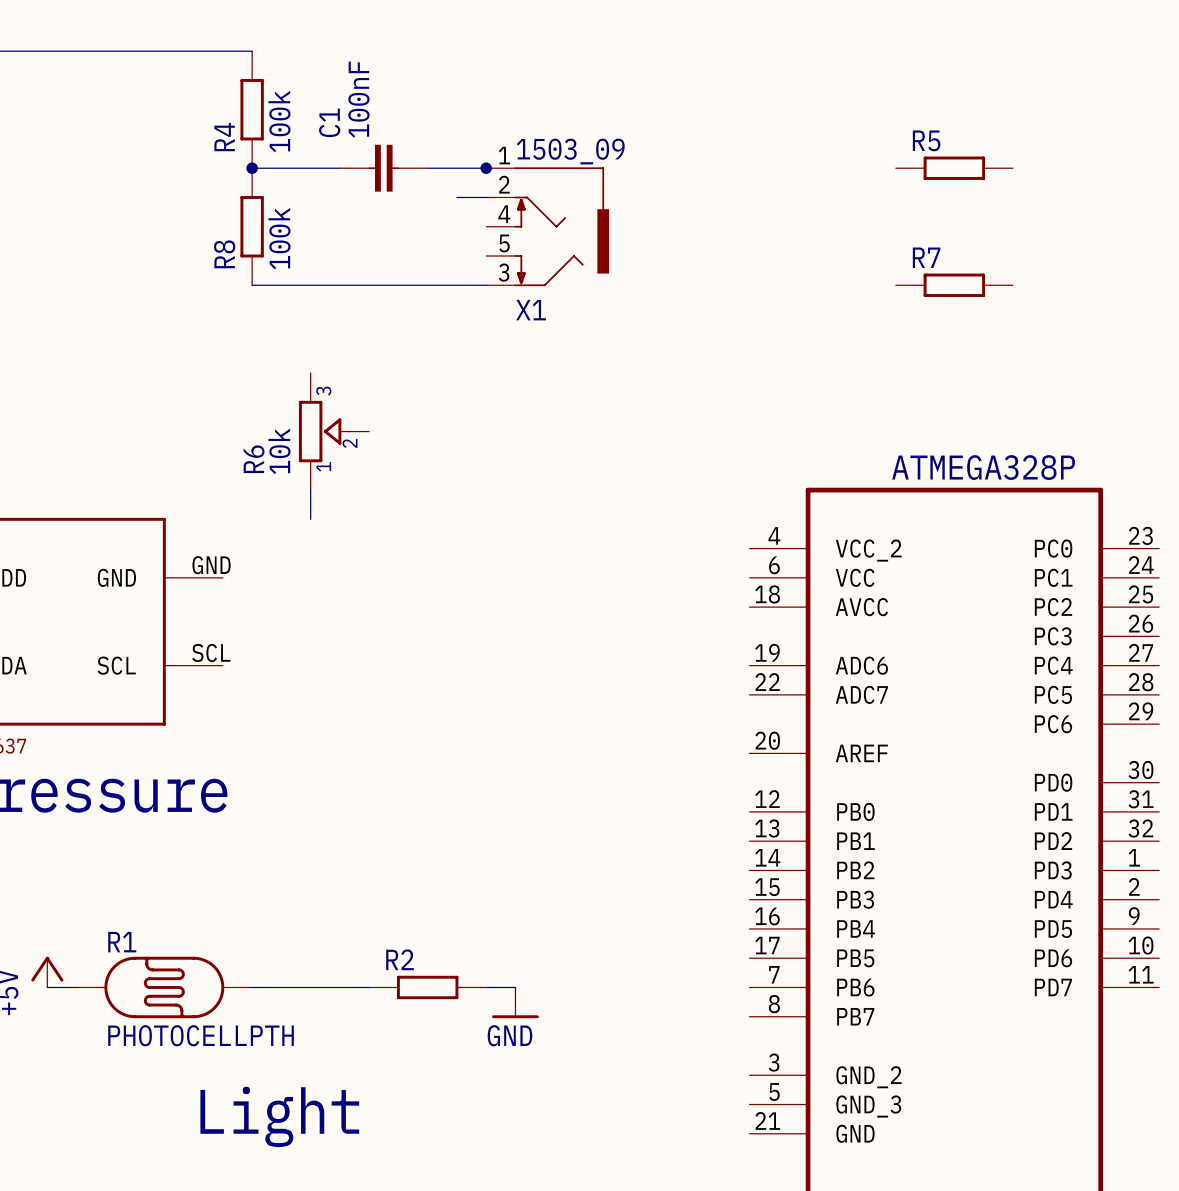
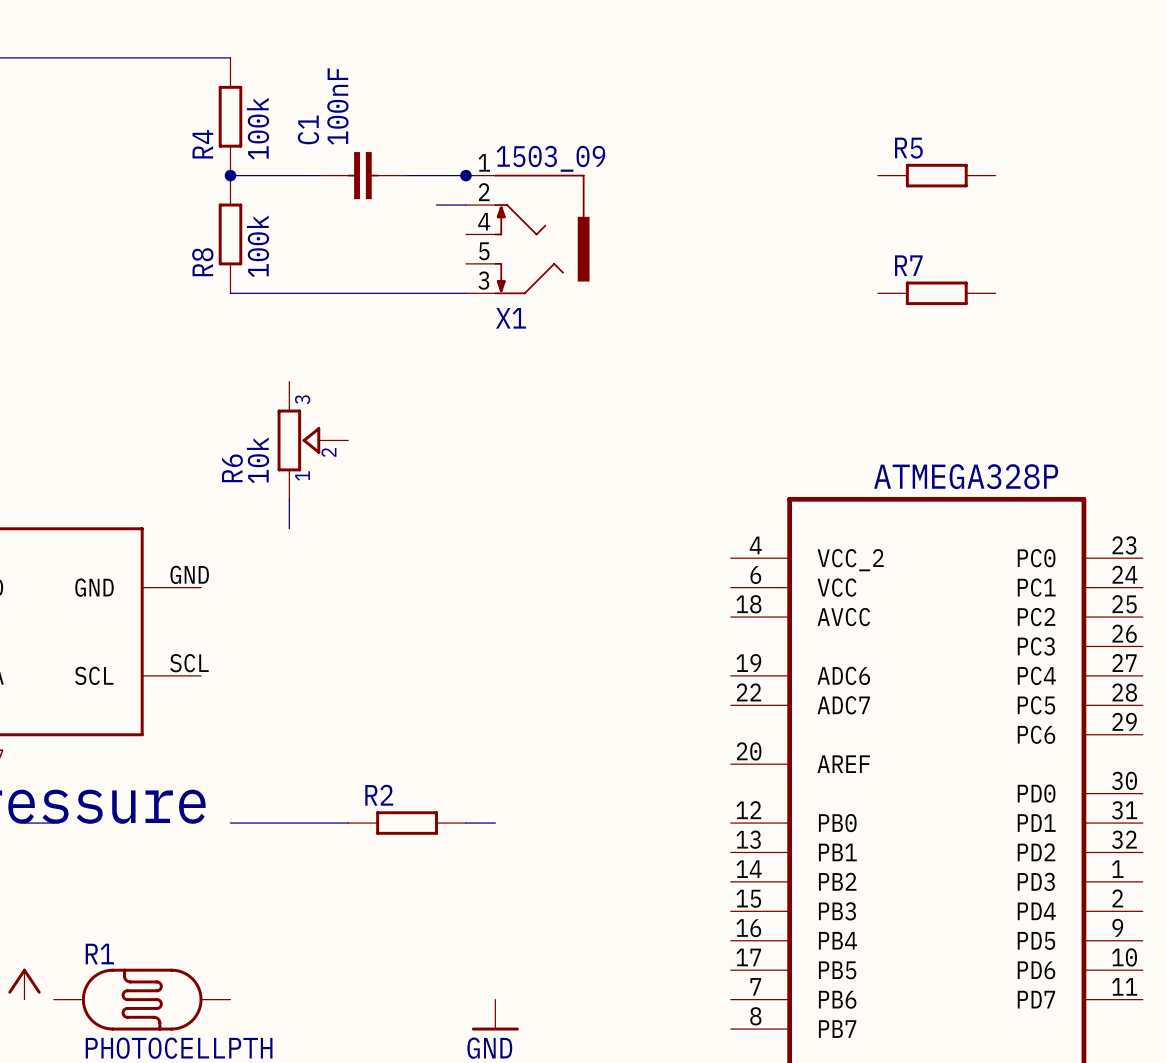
wire: (47, 987) (76, 987) -> (24, 823) (53, 823)
wire: (252, 987) (369, 987) -> (230, 823) (348, 823)
R2 position: (427, 987) -> (407, 823)
wire: (486, 987) (515, 987) -> (465, 823) (495, 823)

